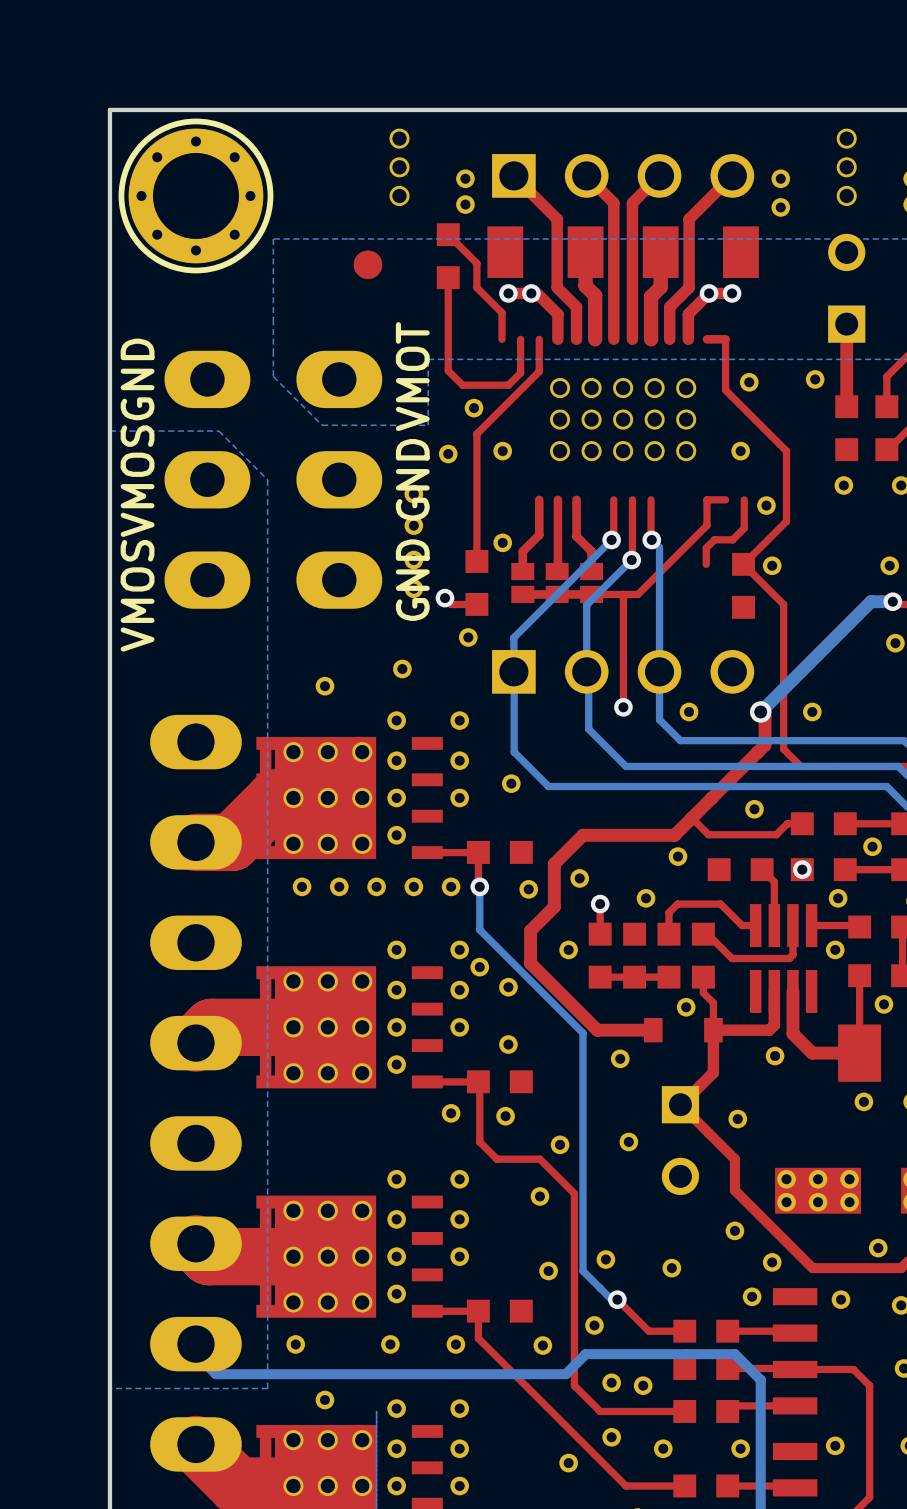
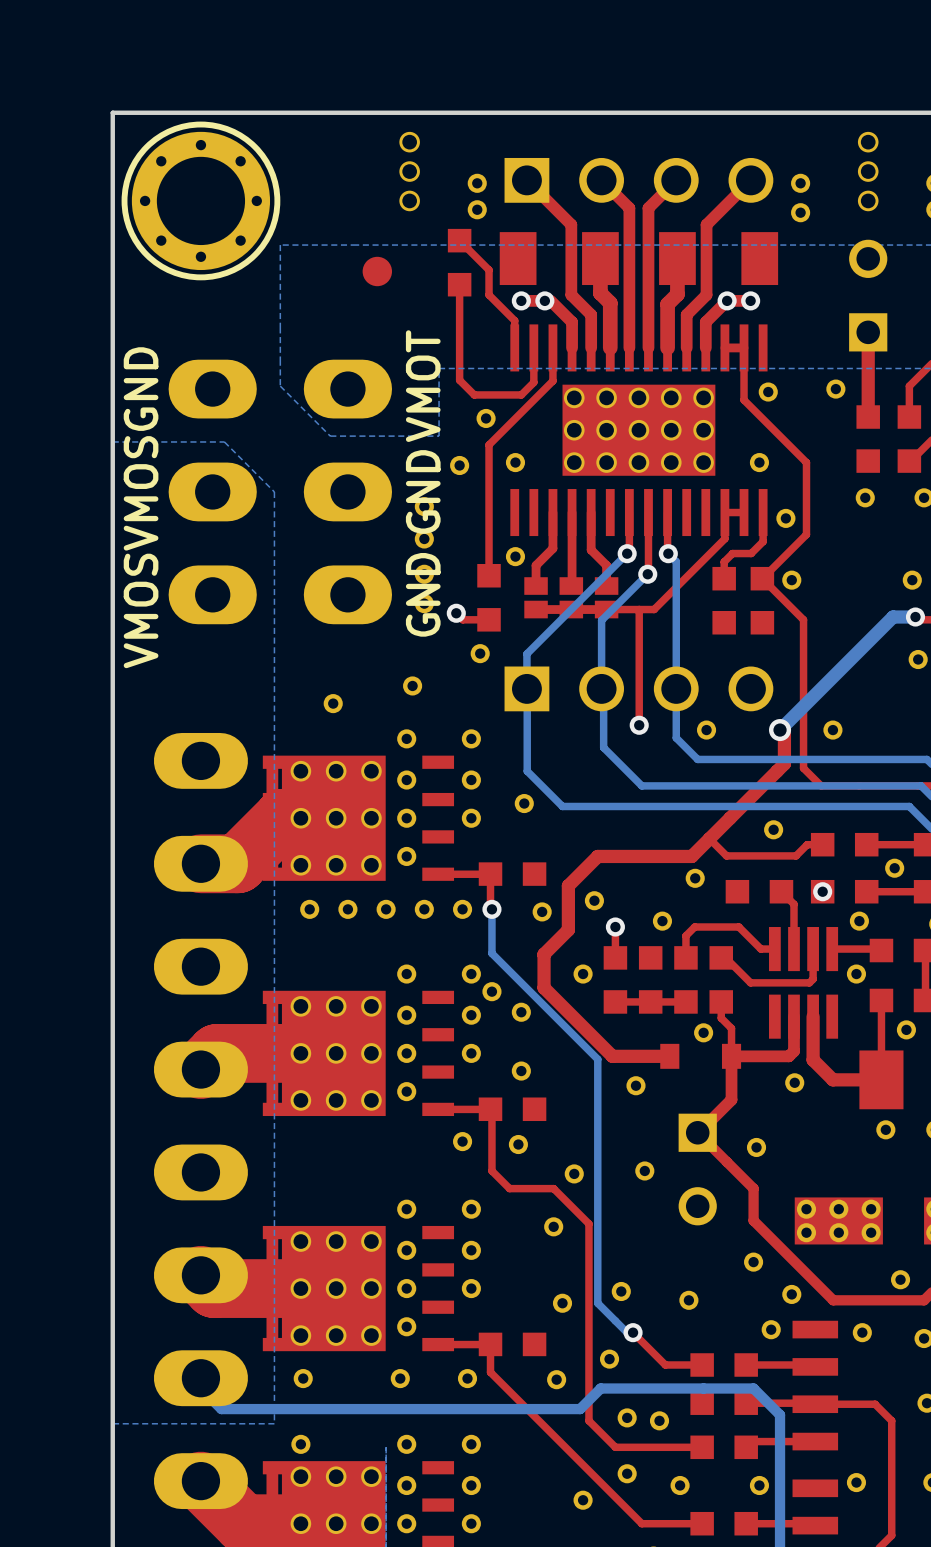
part: none -> (638, 430)
part: none -> (724, 600)
part position: (324, 1400) -> (300, 1444)

